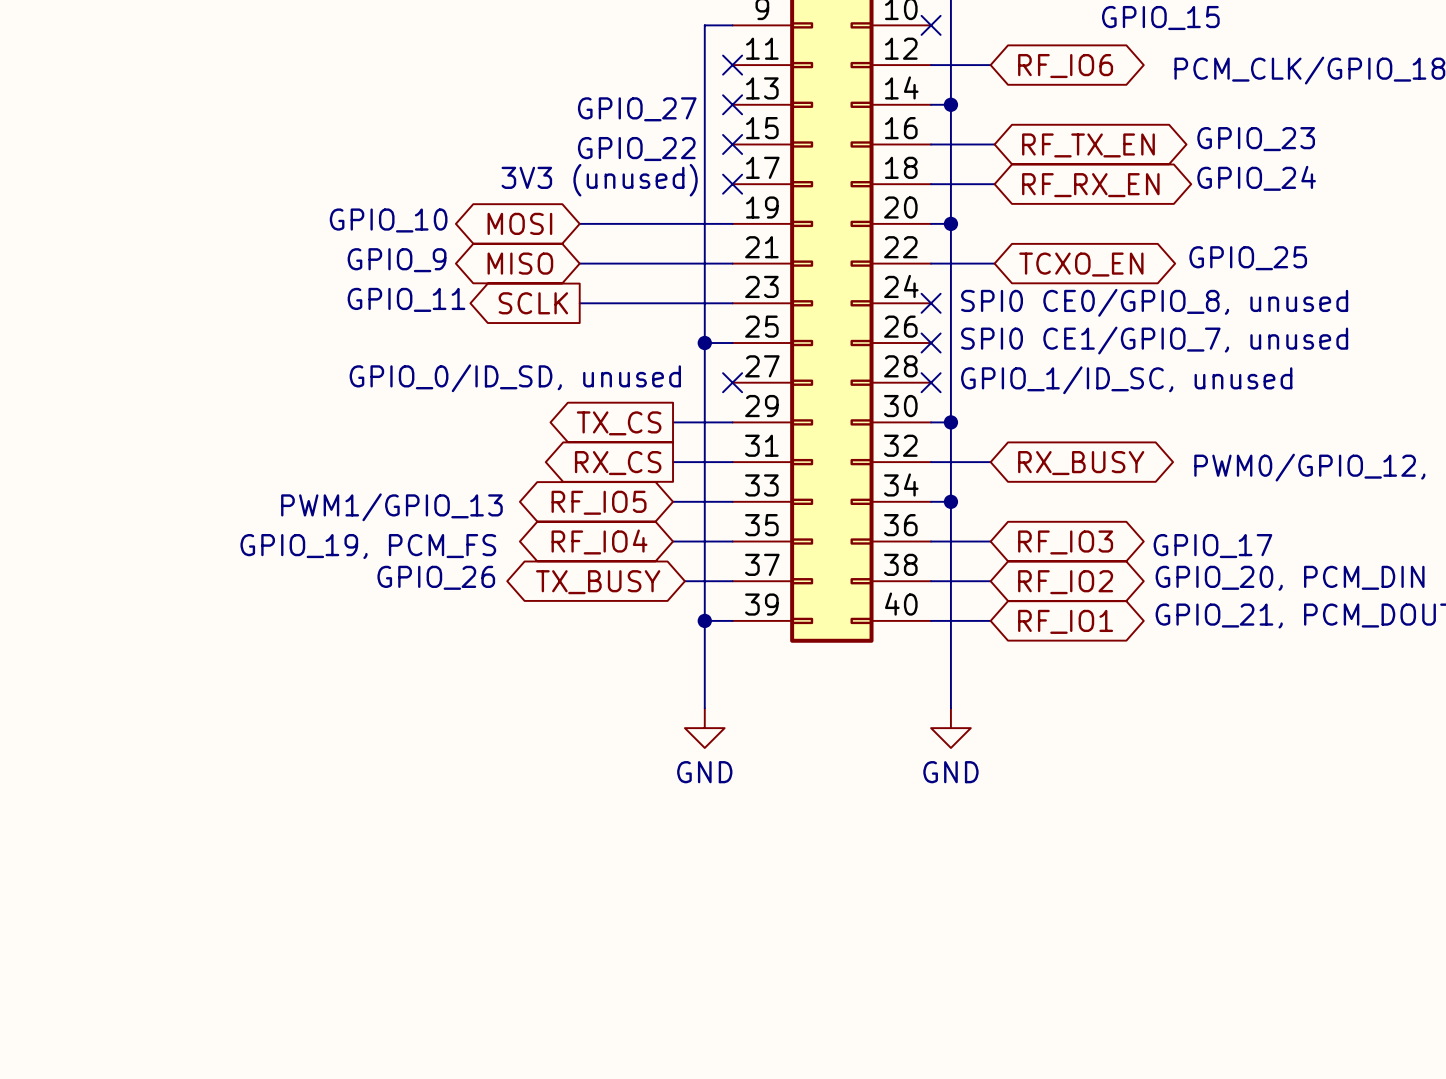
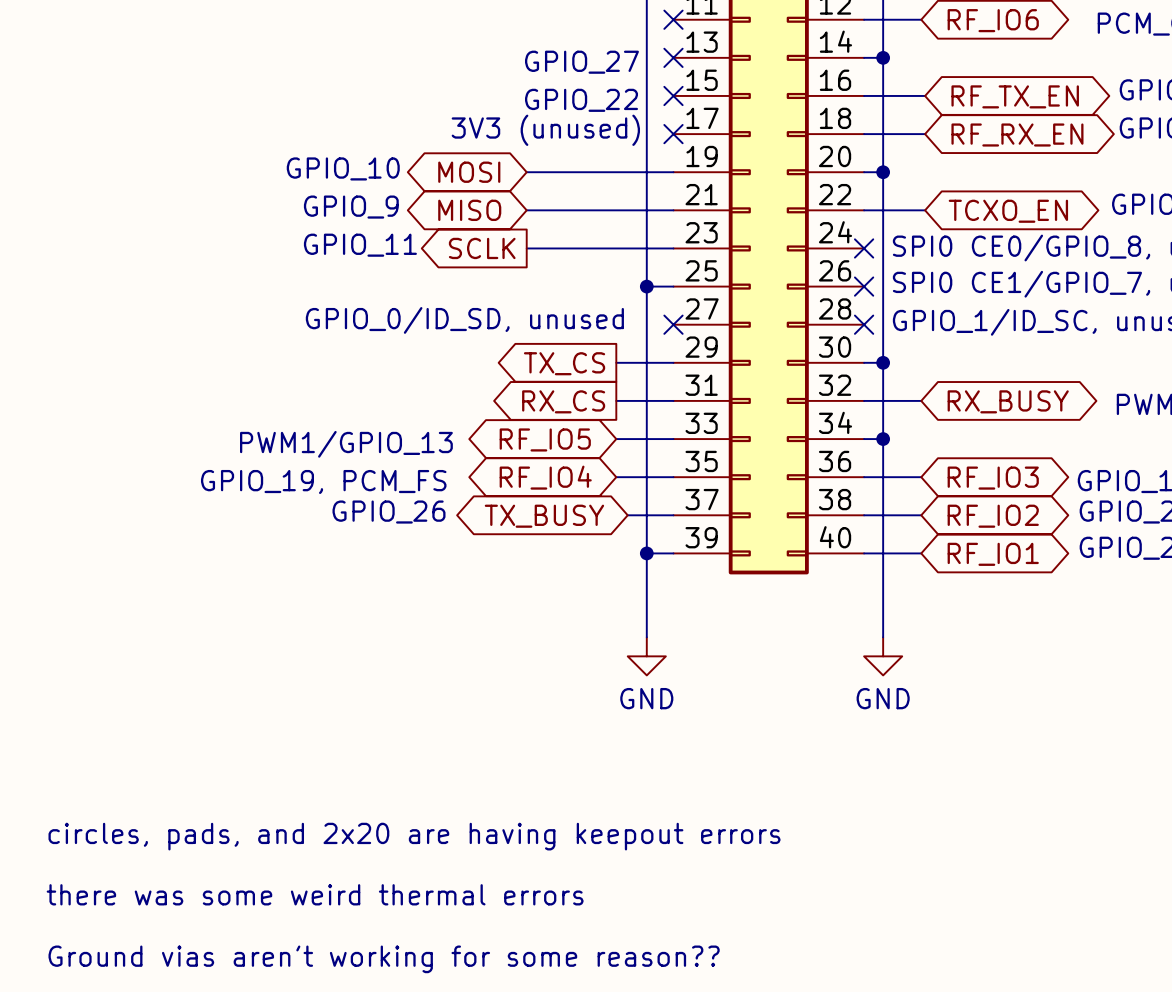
text: none -> circles, pads, and 2x20 are having keepout errors (414, 836)
text: none -> there was some weird thermal errors (315, 894)
text: none -> Ground vias aren't working for some reason?? (384, 959)

